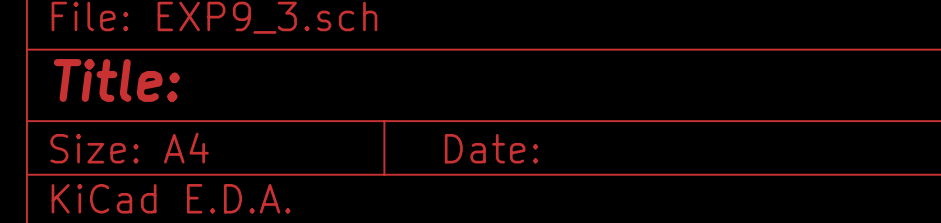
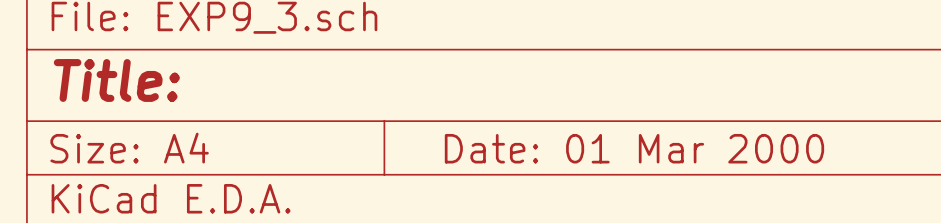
title block: Date: (491, 148) -> Date: 01 Mar 2000 (634, 148)

